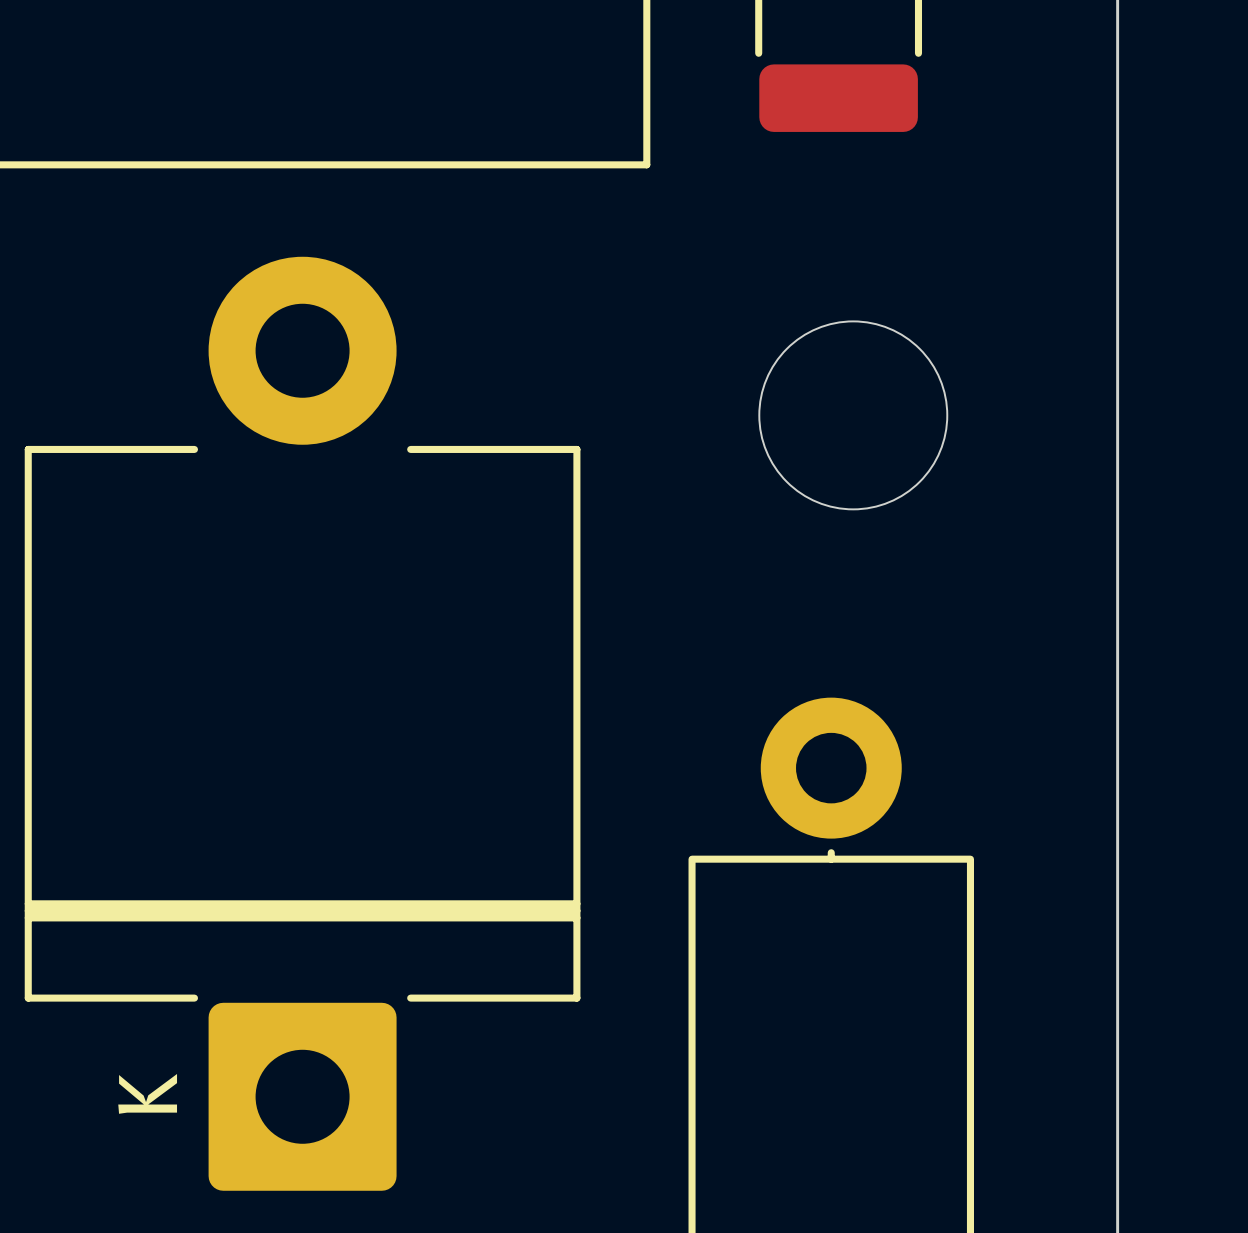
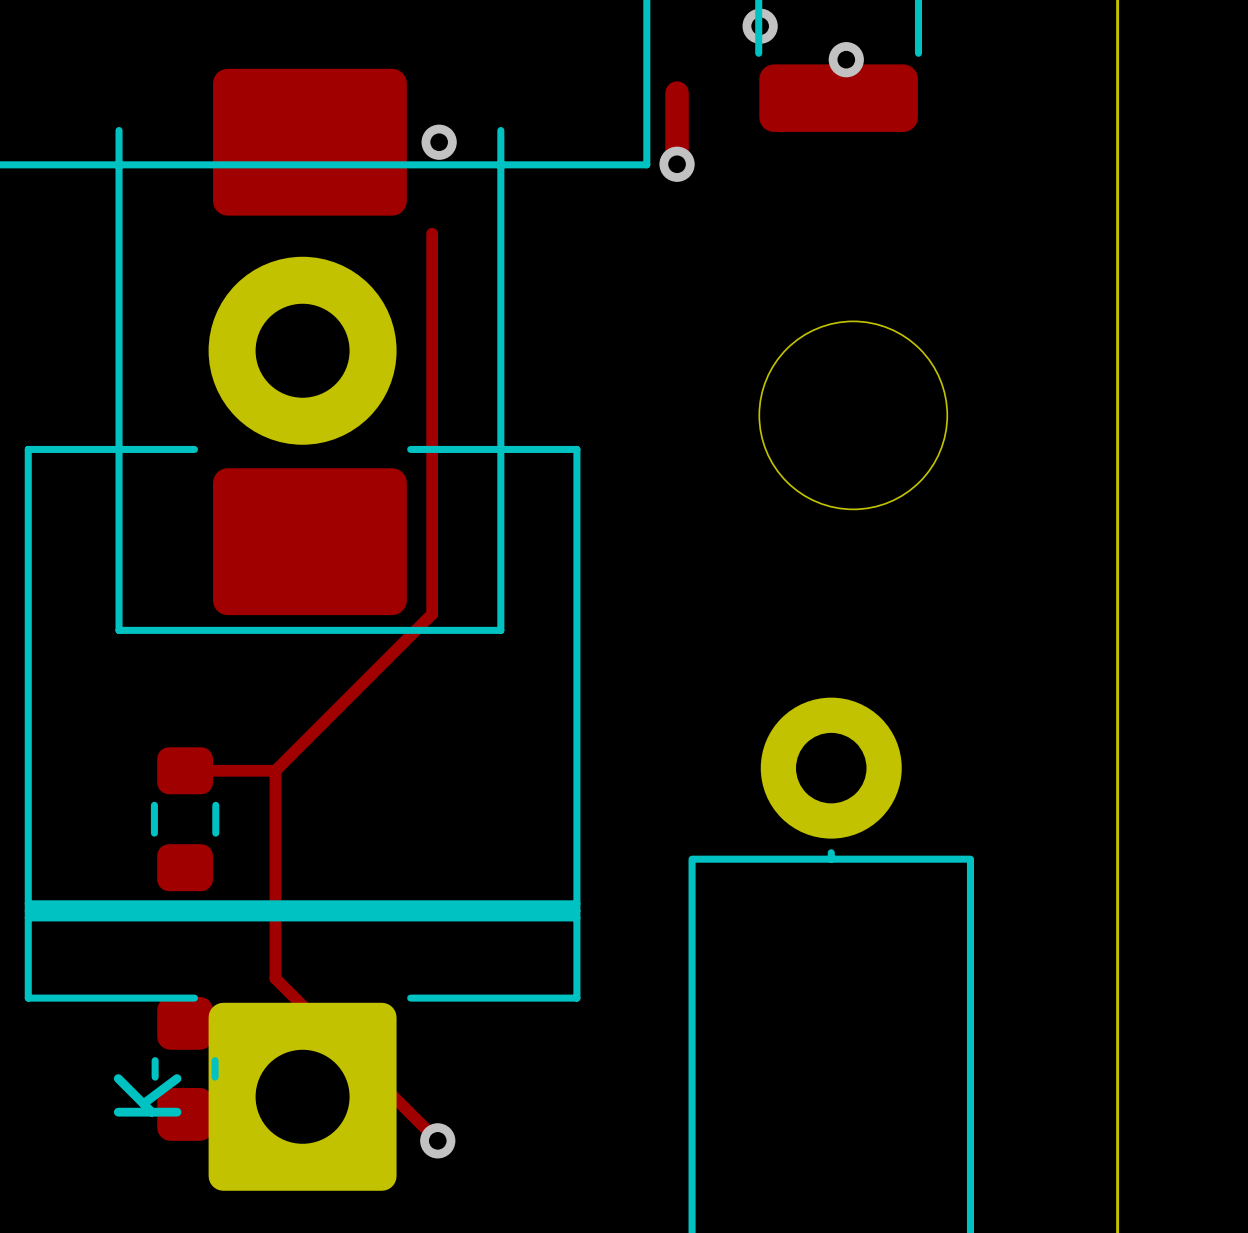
via: none -> (760, 26)
via: none -> (846, 59)
top track: none -> (677, 93) (677, 164)
via: none -> (439, 142)
via: none -> (677, 164)
top track: none -> (432, 233) (432, 614) (275, 770)
part: none -> (309, 351)
top track: none -> (185, 770) (275, 770)
top track: none -> (275, 770) (275, 978) (437, 1140)
part: none -> (185, 819)
part: none -> (185, 1068)
via: none -> (437, 1140)

